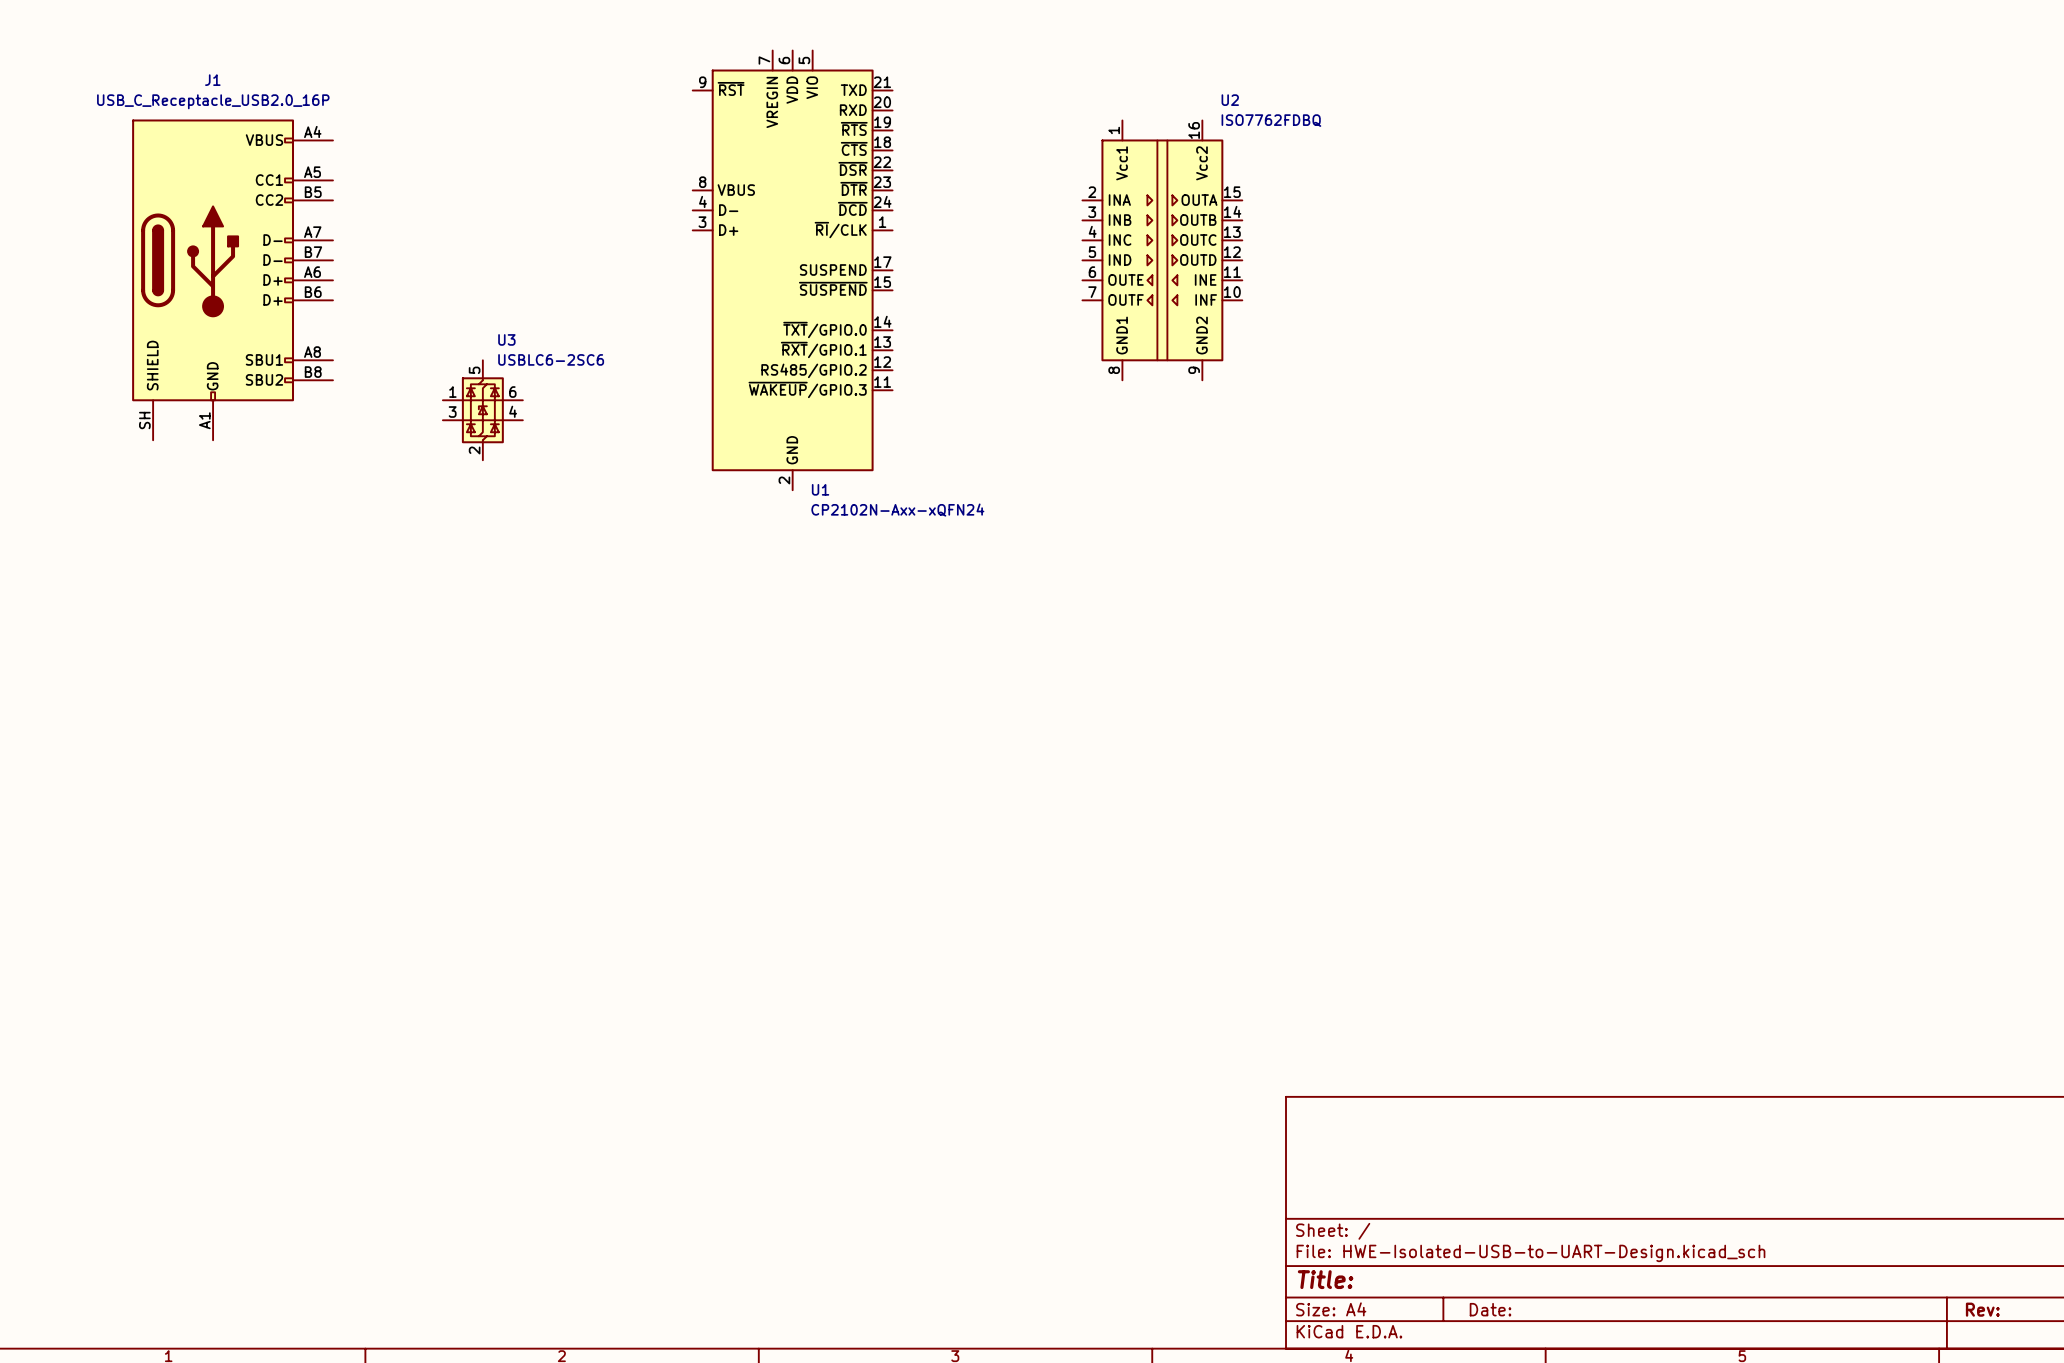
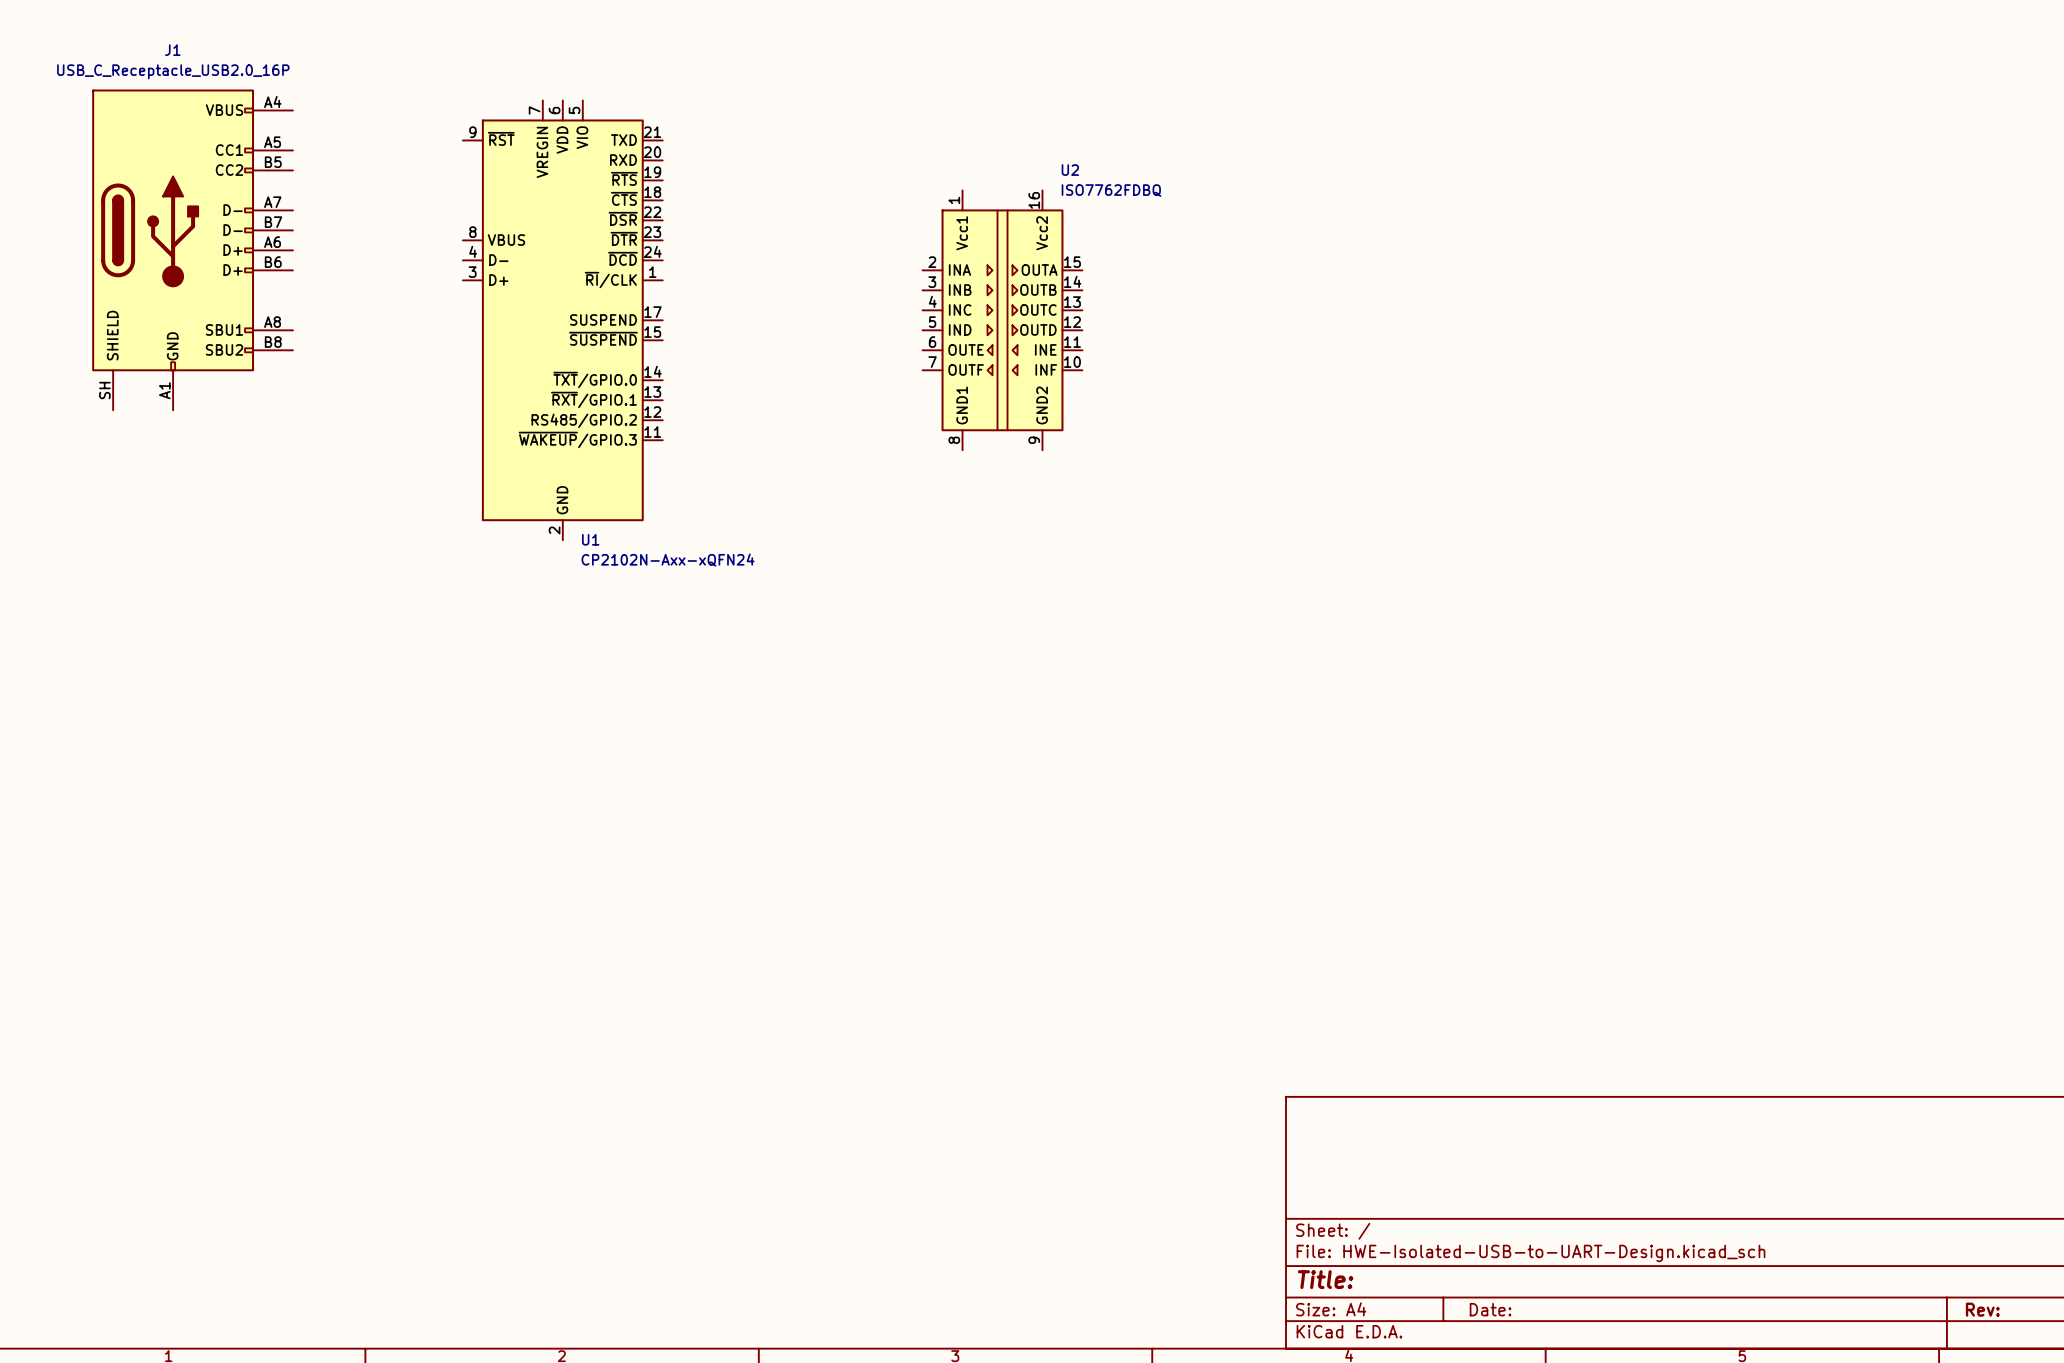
U2 position: (1162, 250) -> (1002, 320)
U1 position: (792, 270) -> (562, 320)
J1 position: (232, 279) -> (192, 249)
U3: USBLC6-2SC6 (482, 410) -> none

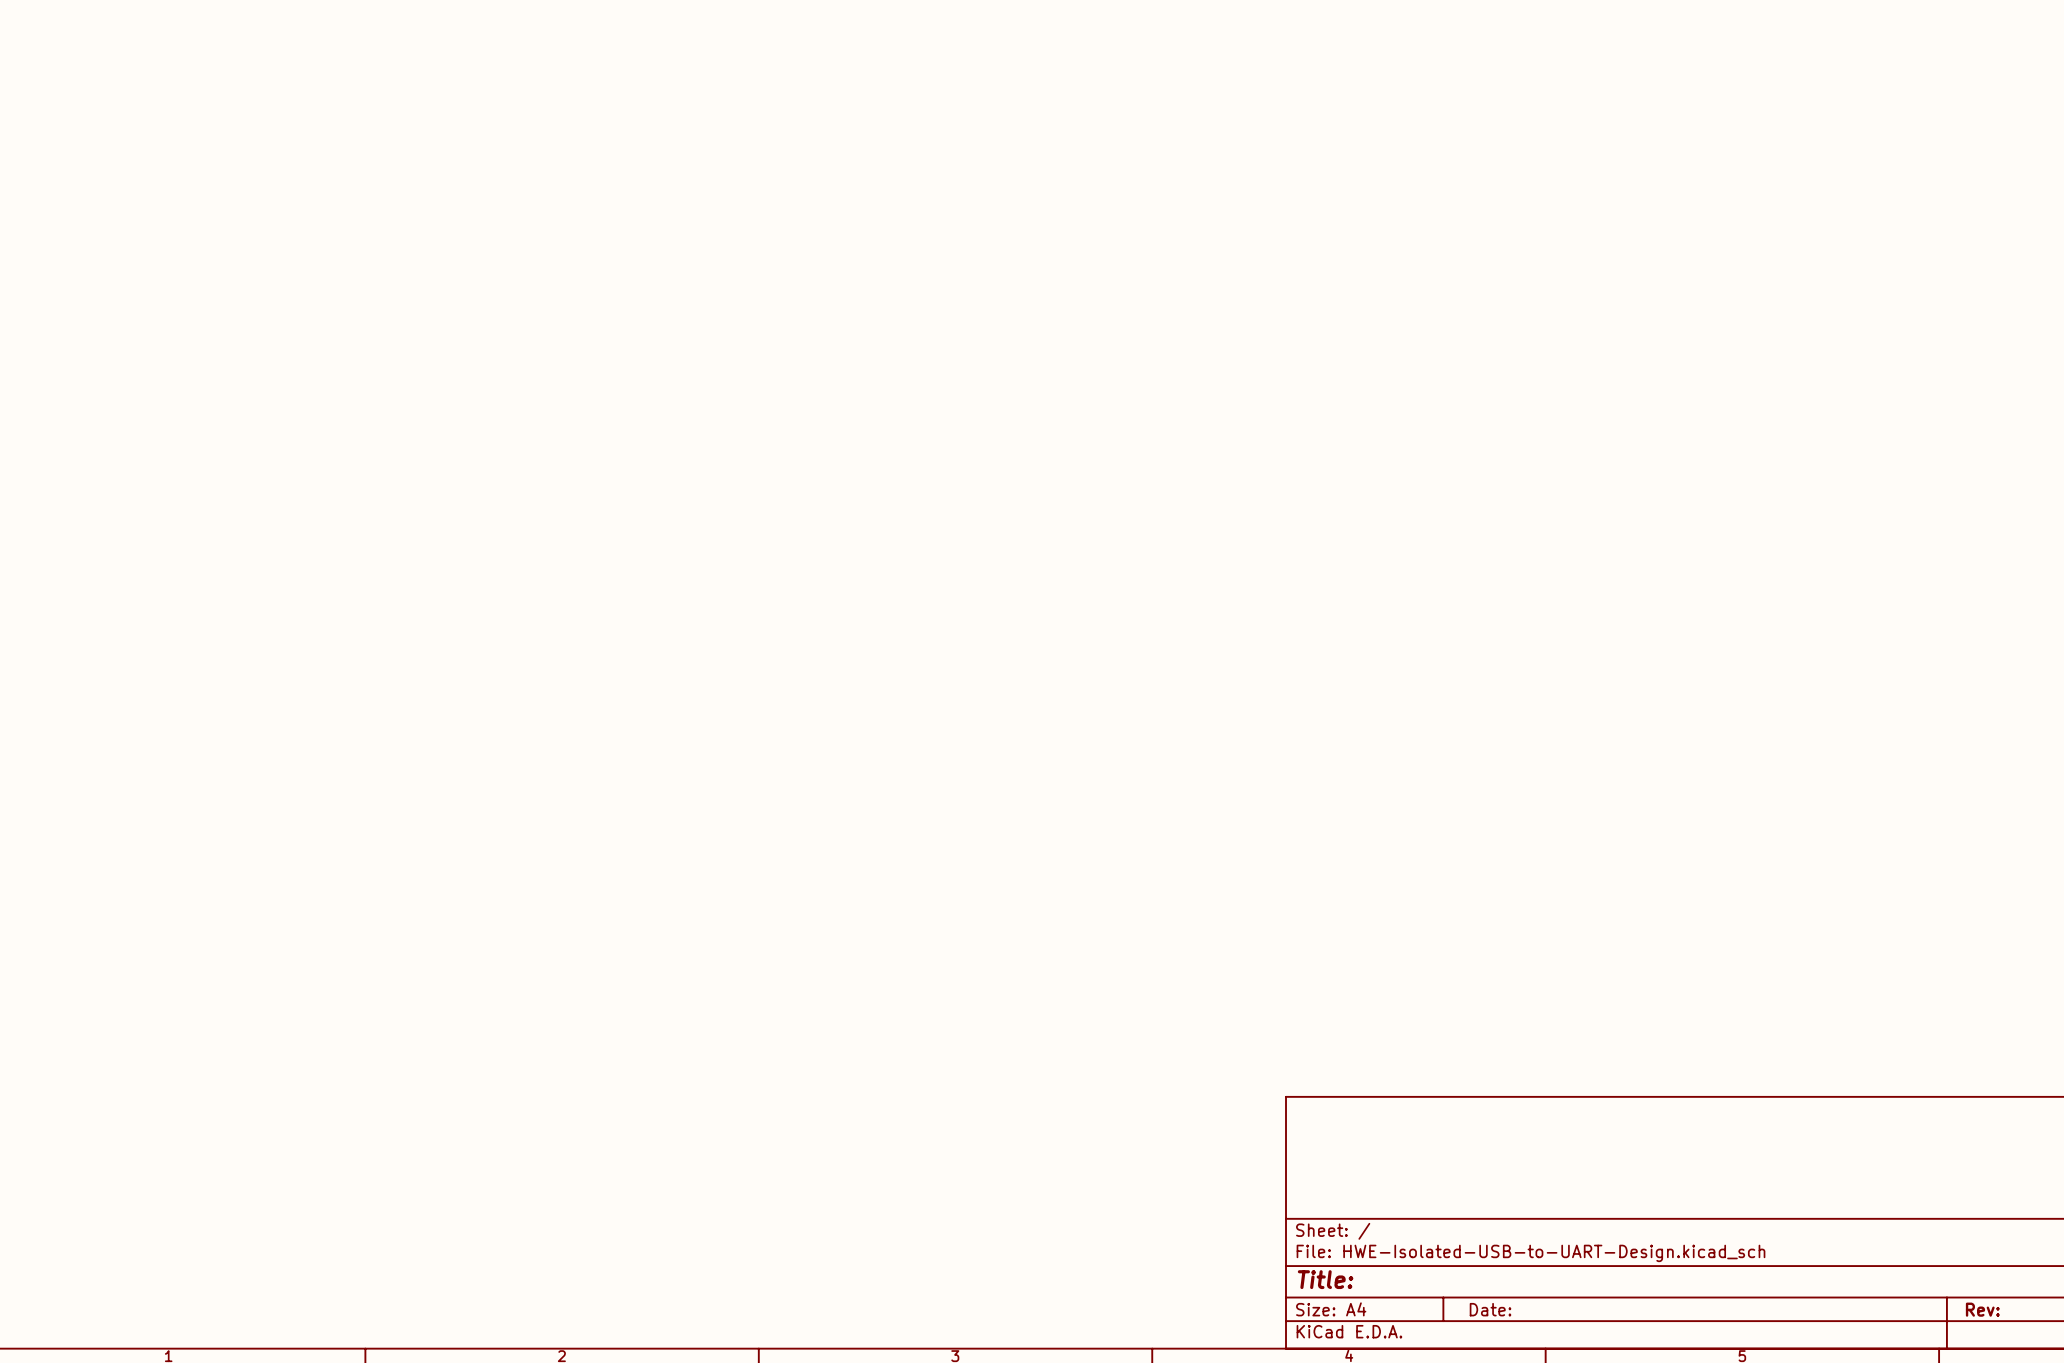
J1: USB_C_Receptacle_USB2.0_16P (192, 249) -> none
U1: CP2102N-Axx-xQFN24 (562, 320) -> none
U2: ISO7762FDBQ (1002, 320) -> none

